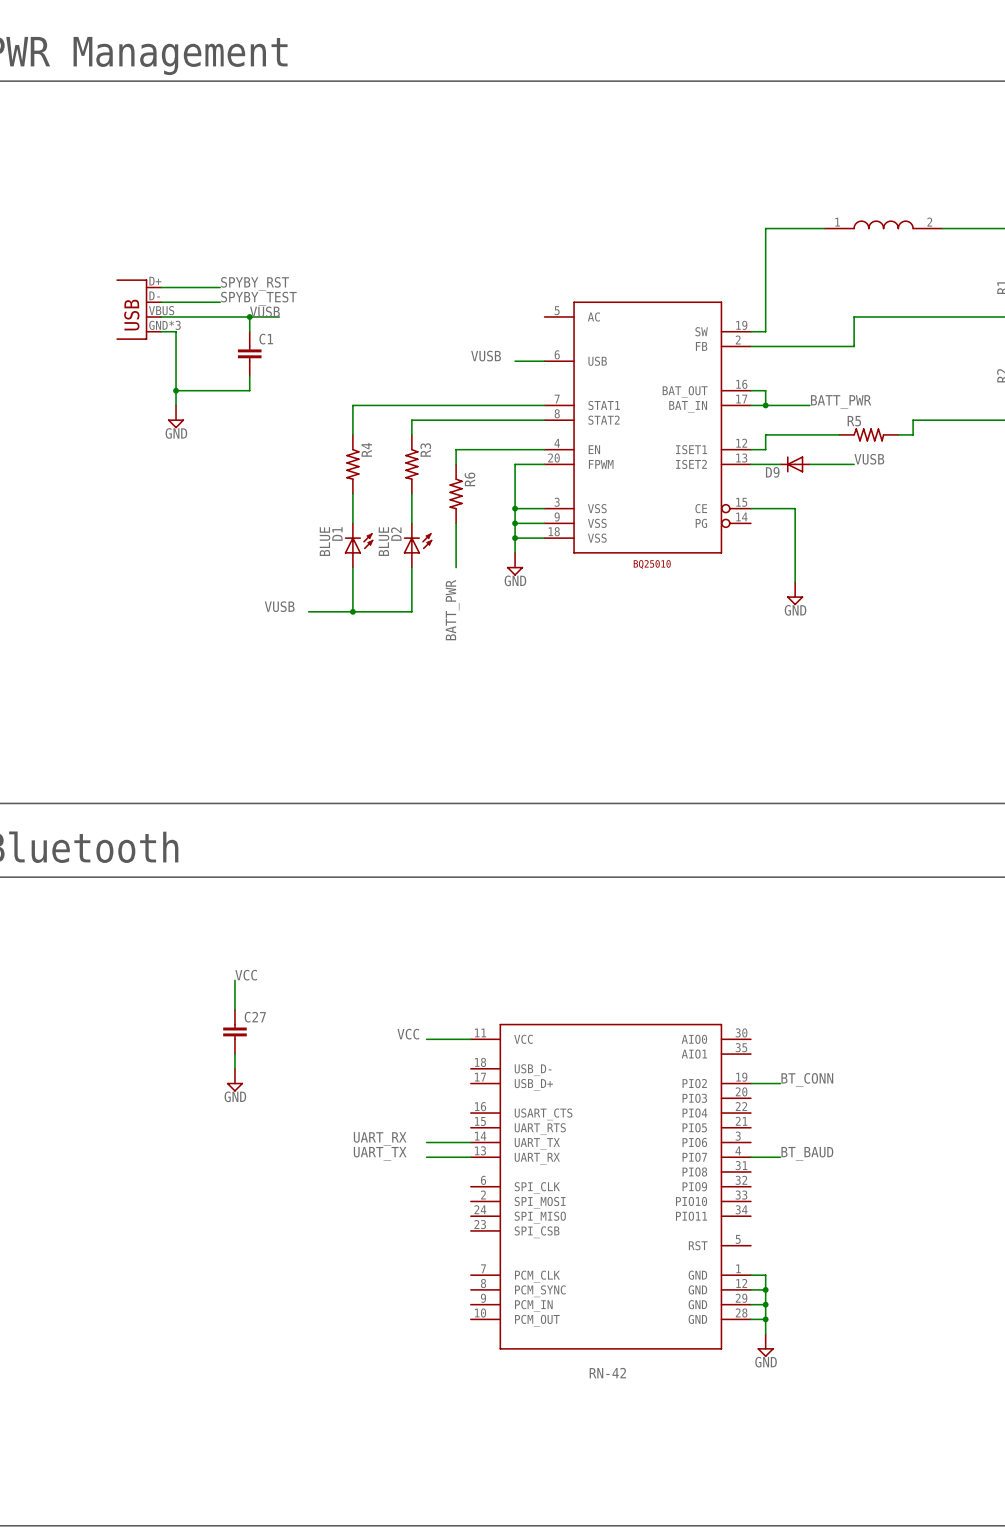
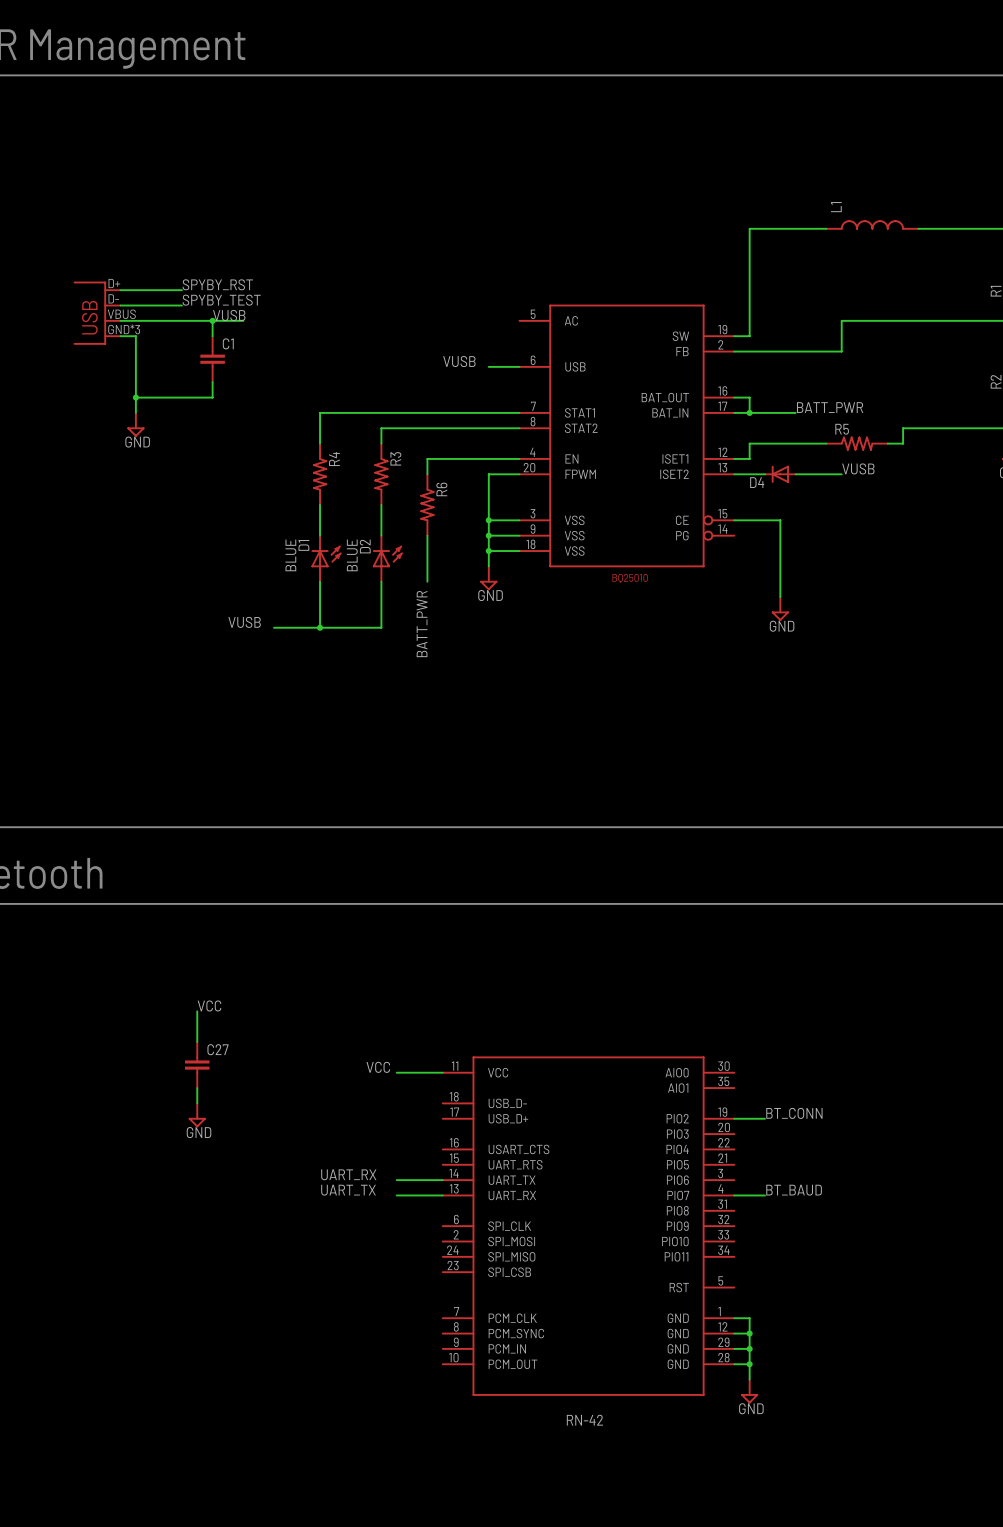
part: (883, 224) -> none
L1: none -> (872, 224)
D9 name: D9 (772, 472) -> D4 (757, 482)

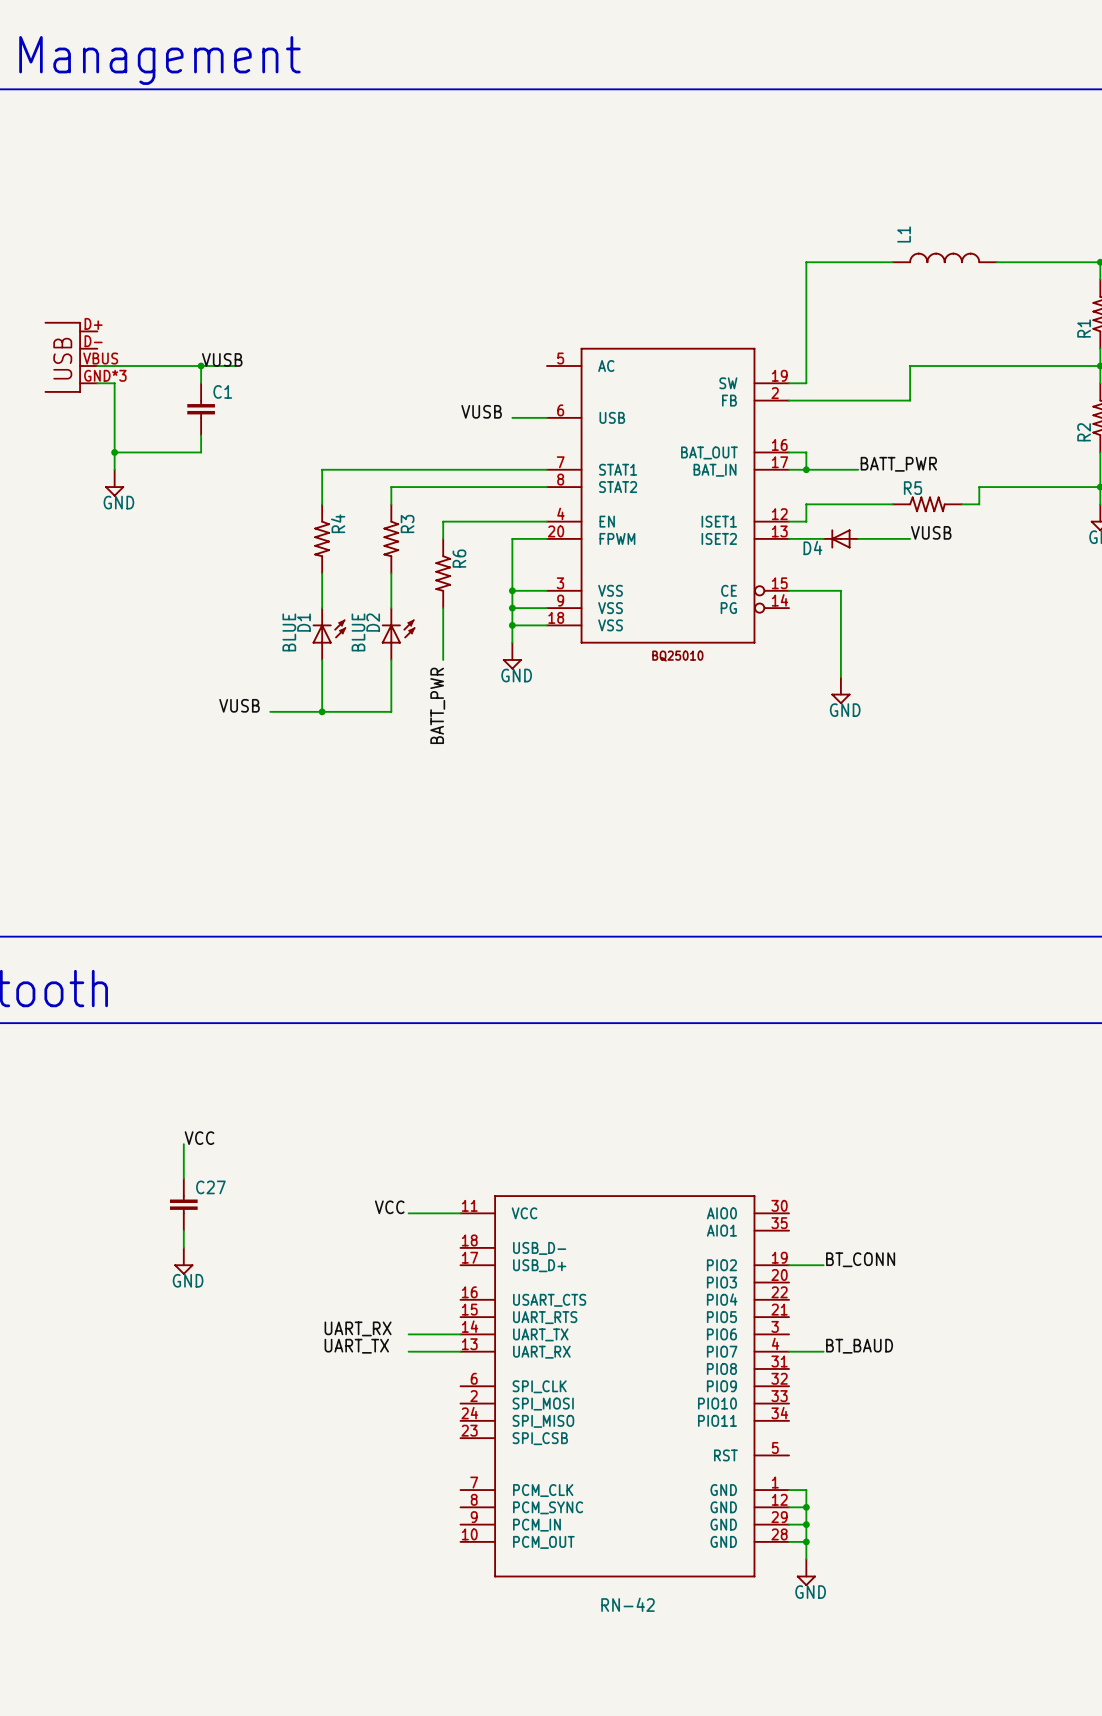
label: SPYBY_RST (217, 284) -> none
wire: (120, 290) (181, 290) -> none
label: SPYBY_TEST (221, 300) -> none
wire: (120, 305) (181, 305) -> none

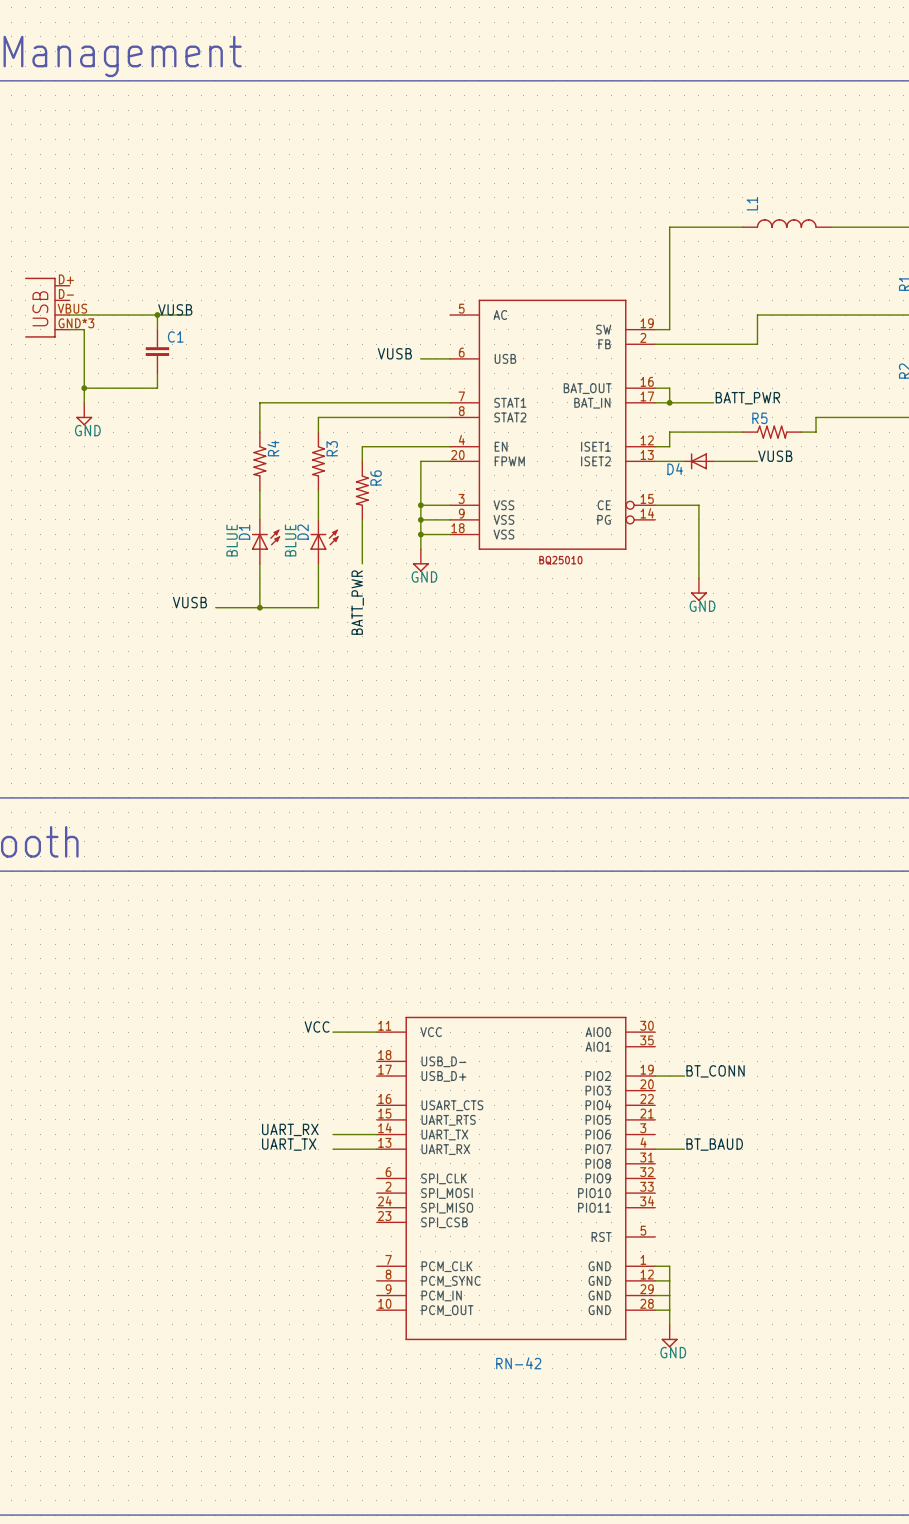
label: VCC (199, 1138) -> none
wire: (183, 1144) (183, 1178) -> none
C27: (183, 1204) -> none
wire: (183, 1230) (183, 1247) -> none
power symbol: GND (183, 1261) -> none
junction: (806, 1507) -> none
junction: (806, 1524) -> none
junction: (806, 1541) -> none

